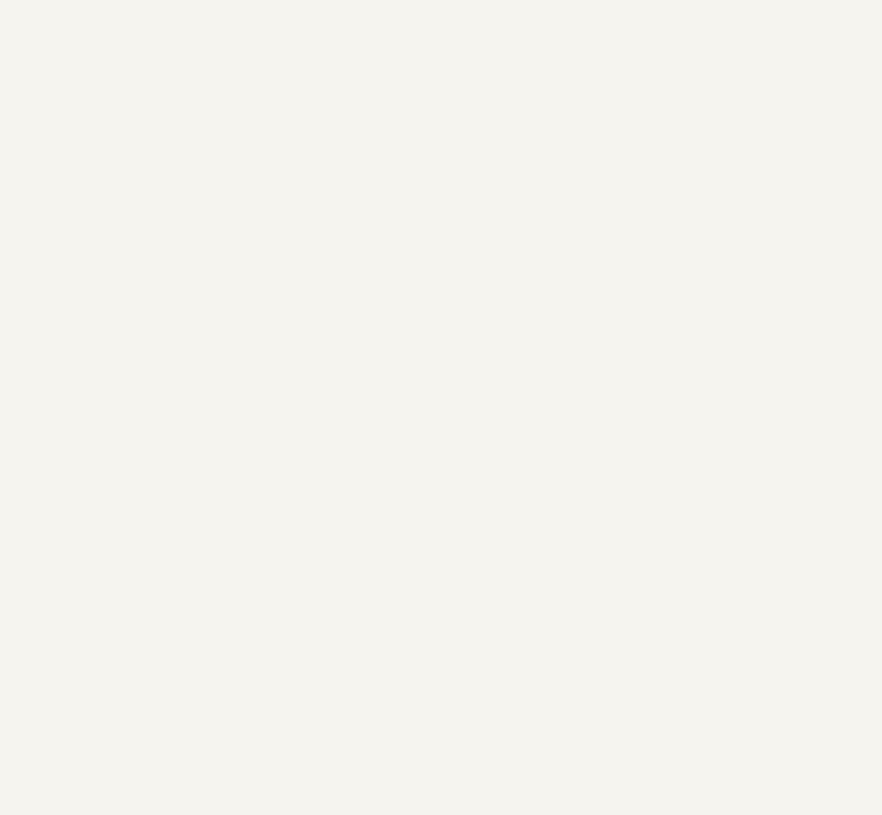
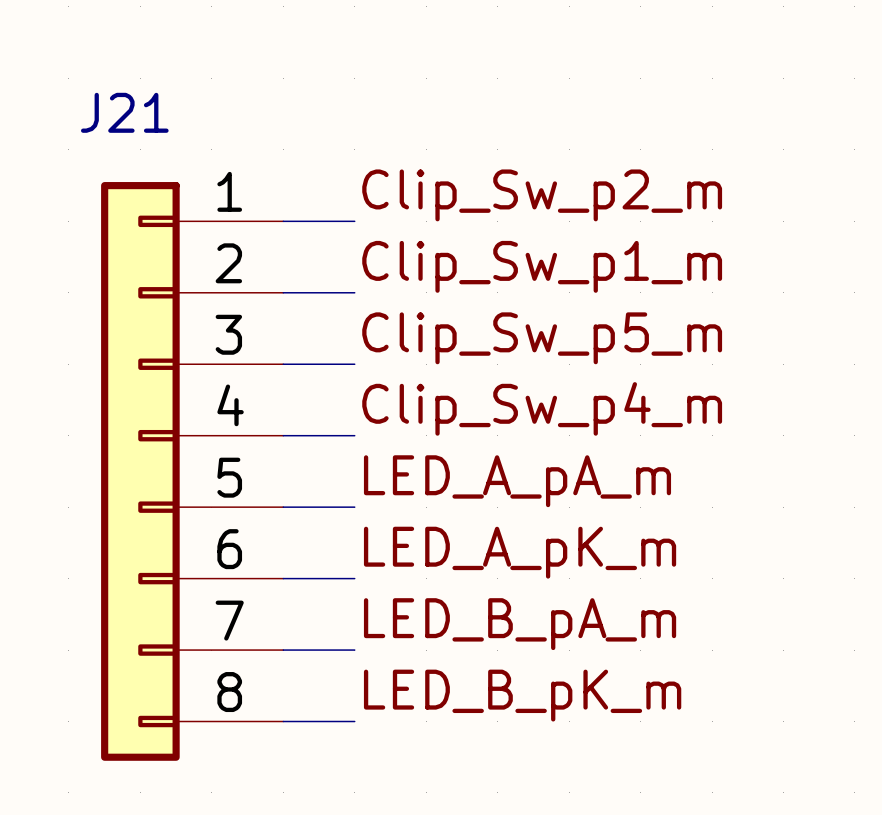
label: none -> Clip_Sw_p2_m (542, 195)
wire: none -> (283, 221) (354, 221)
label: none -> Clip_Sw_p1_m (542, 266)
wire: none -> (283, 292) (354, 292)
label: none -> Clip_Sw_p5_m (542, 338)
wire: none -> (283, 364) (354, 364)
label: none -> Clip_Sw_p4_m (542, 408)
wire: none -> (283, 435) (354, 435)
J21: none -> (192, 471)
label: none -> LED_A_pA_m (517, 481)
wire: none -> (283, 507) (354, 507)
label: none -> LED_A_pK_m (520, 552)
wire: none -> (283, 578) (354, 578)
label: none -> LED_B_pA_m (520, 624)
wire: none -> (283, 650) (354, 650)
label: none -> LED_B_pK_m (522, 695)
wire: none -> (283, 721) (354, 721)

